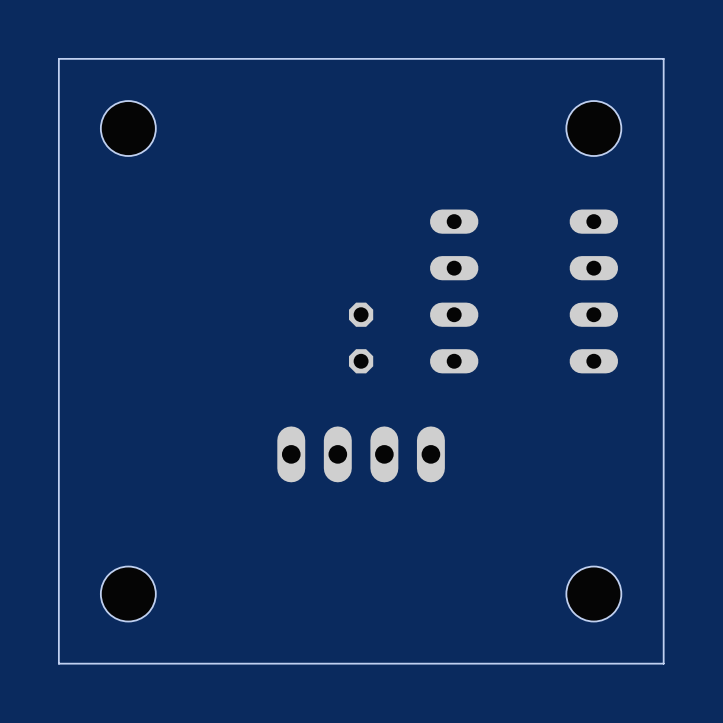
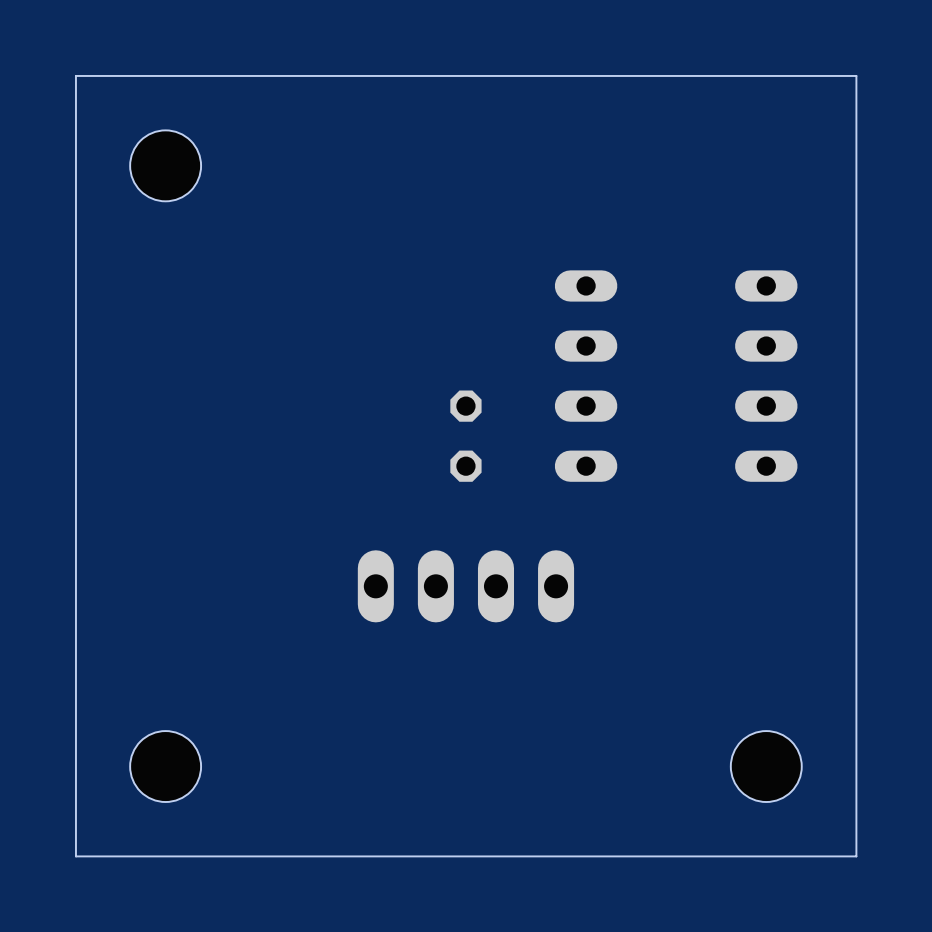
hole: (593, 128) -> none

